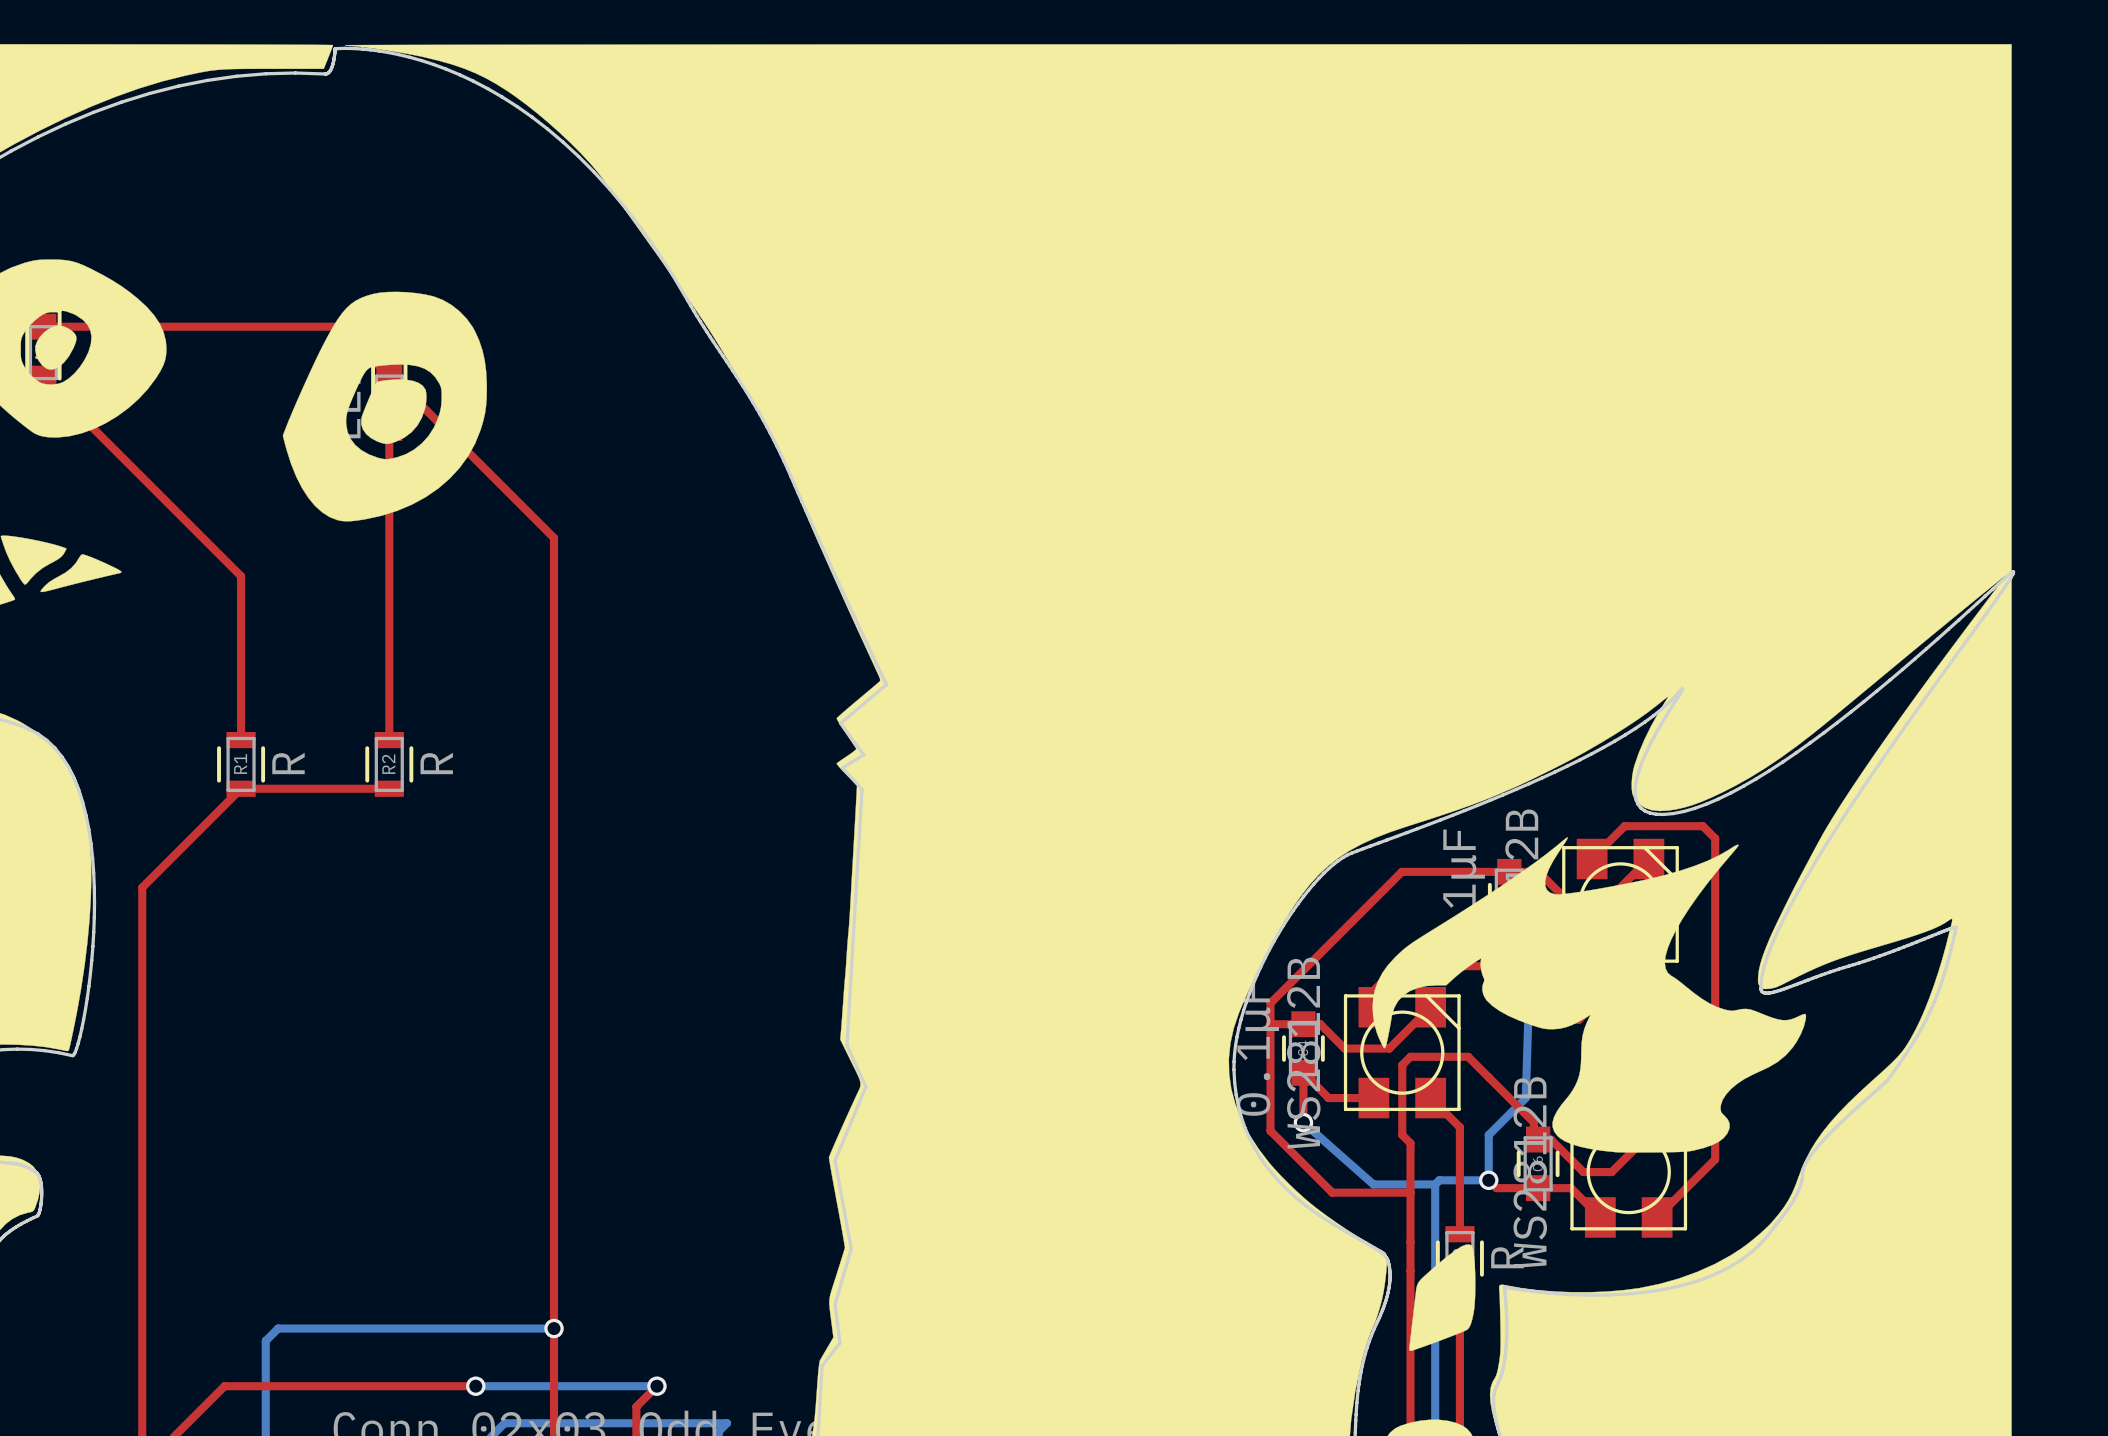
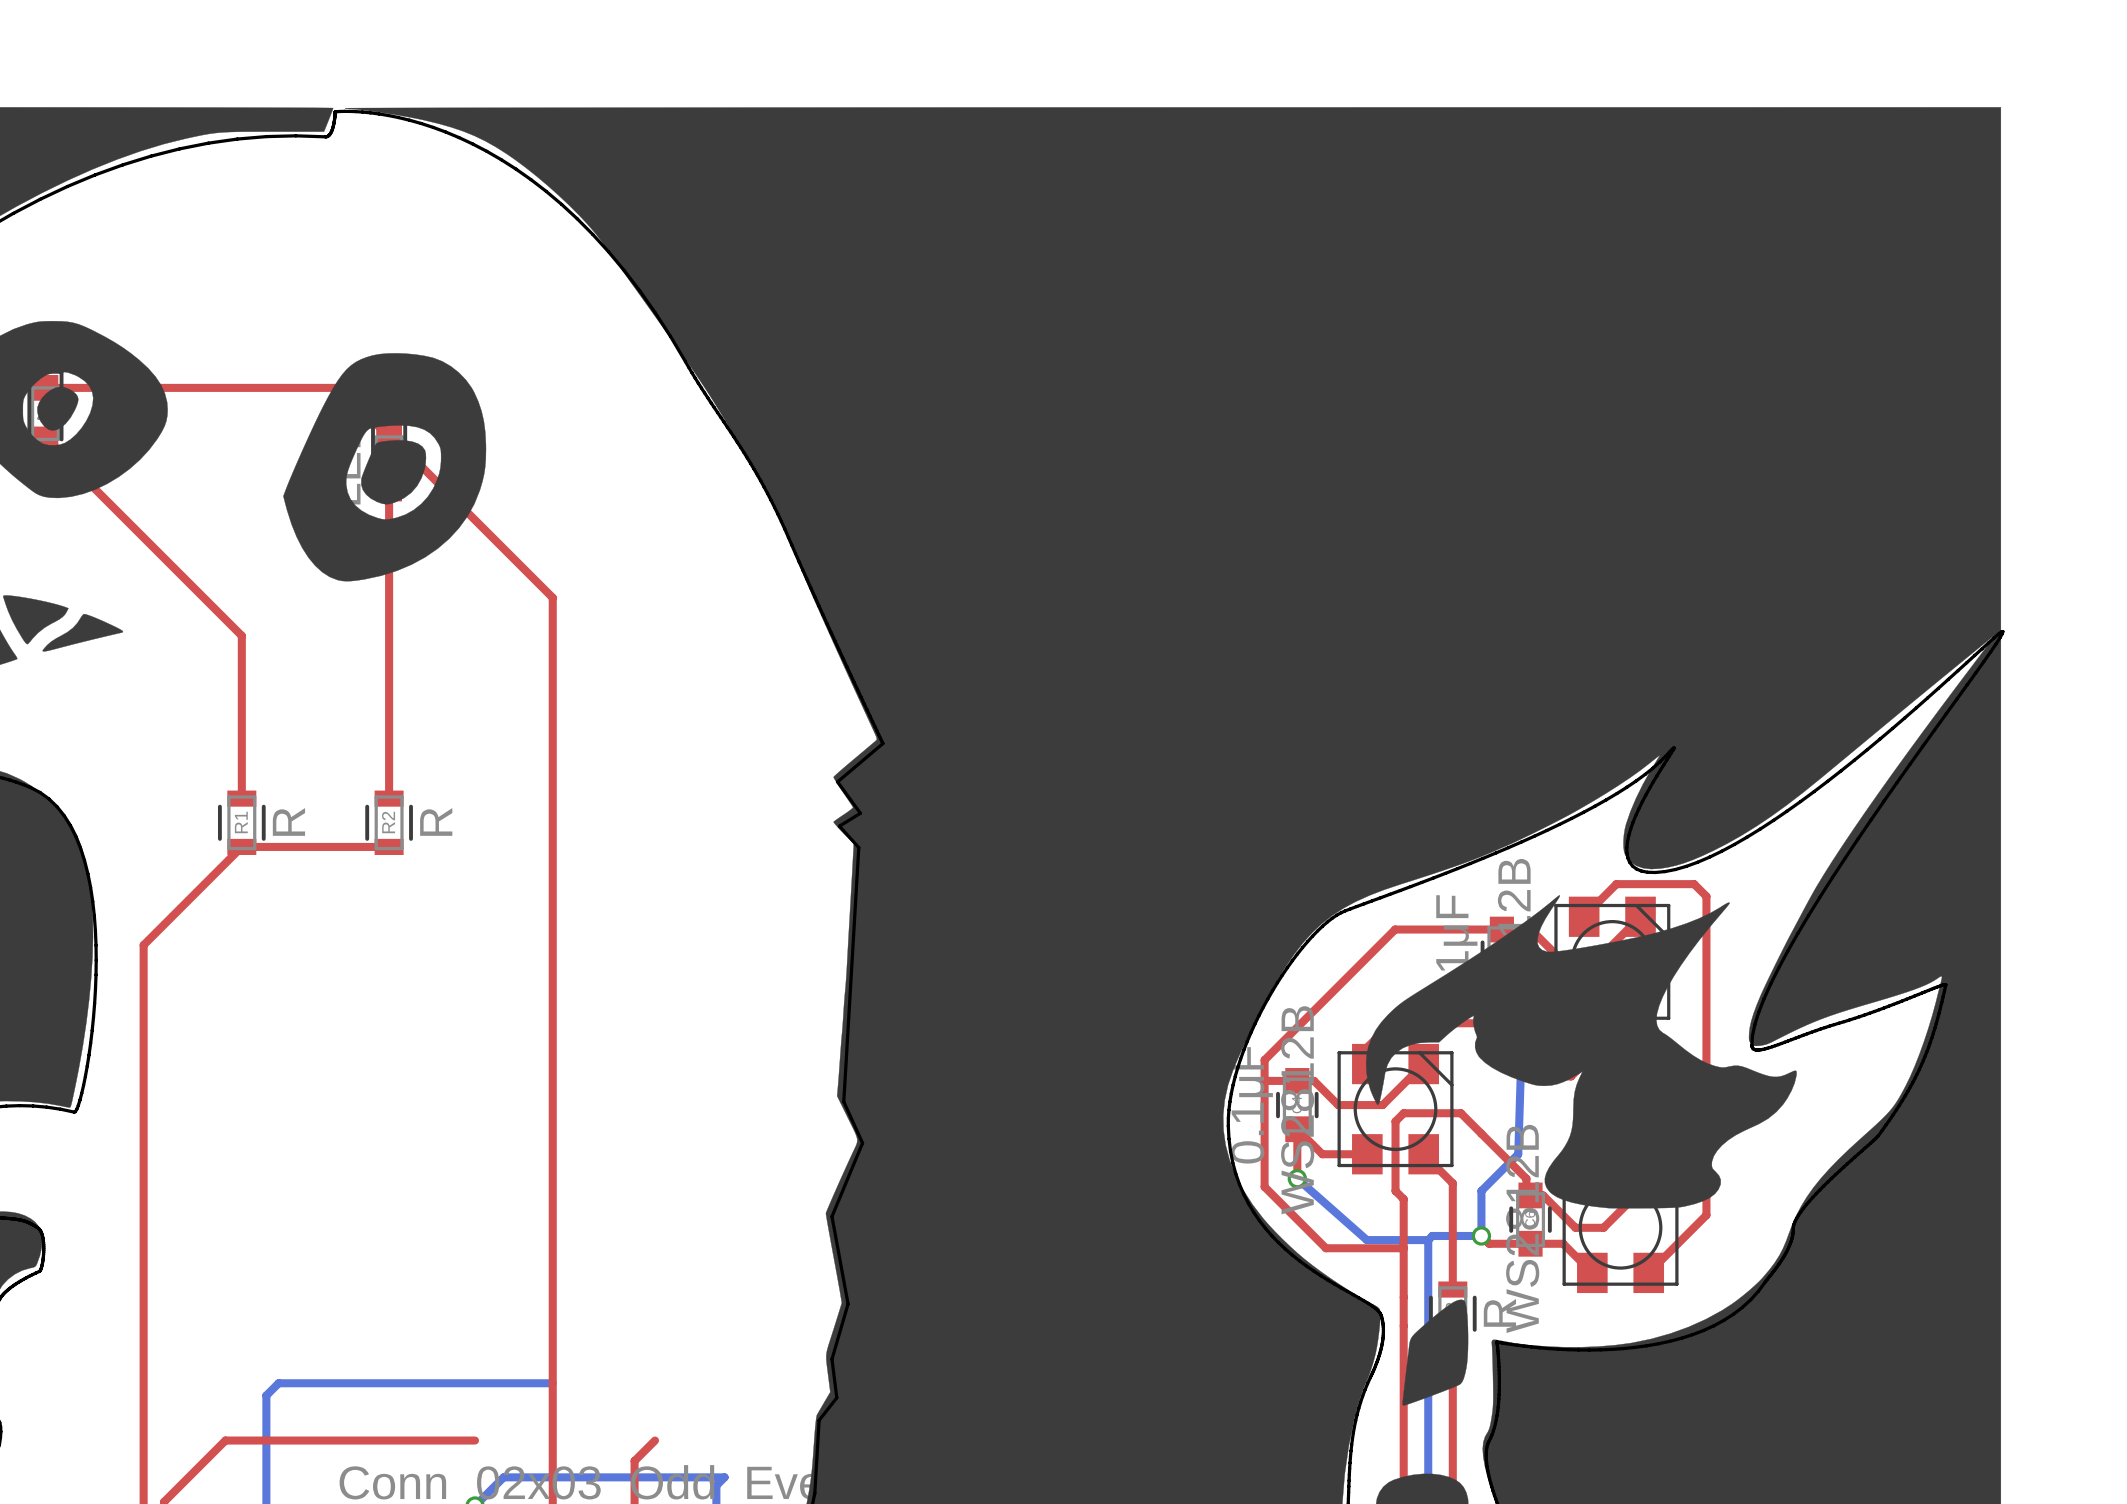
via: (554, 1328) -> none
bottom track: (475, 1386) (656, 1386) -> none
via: (475, 1386) -> none
via: (656, 1386) -> none

